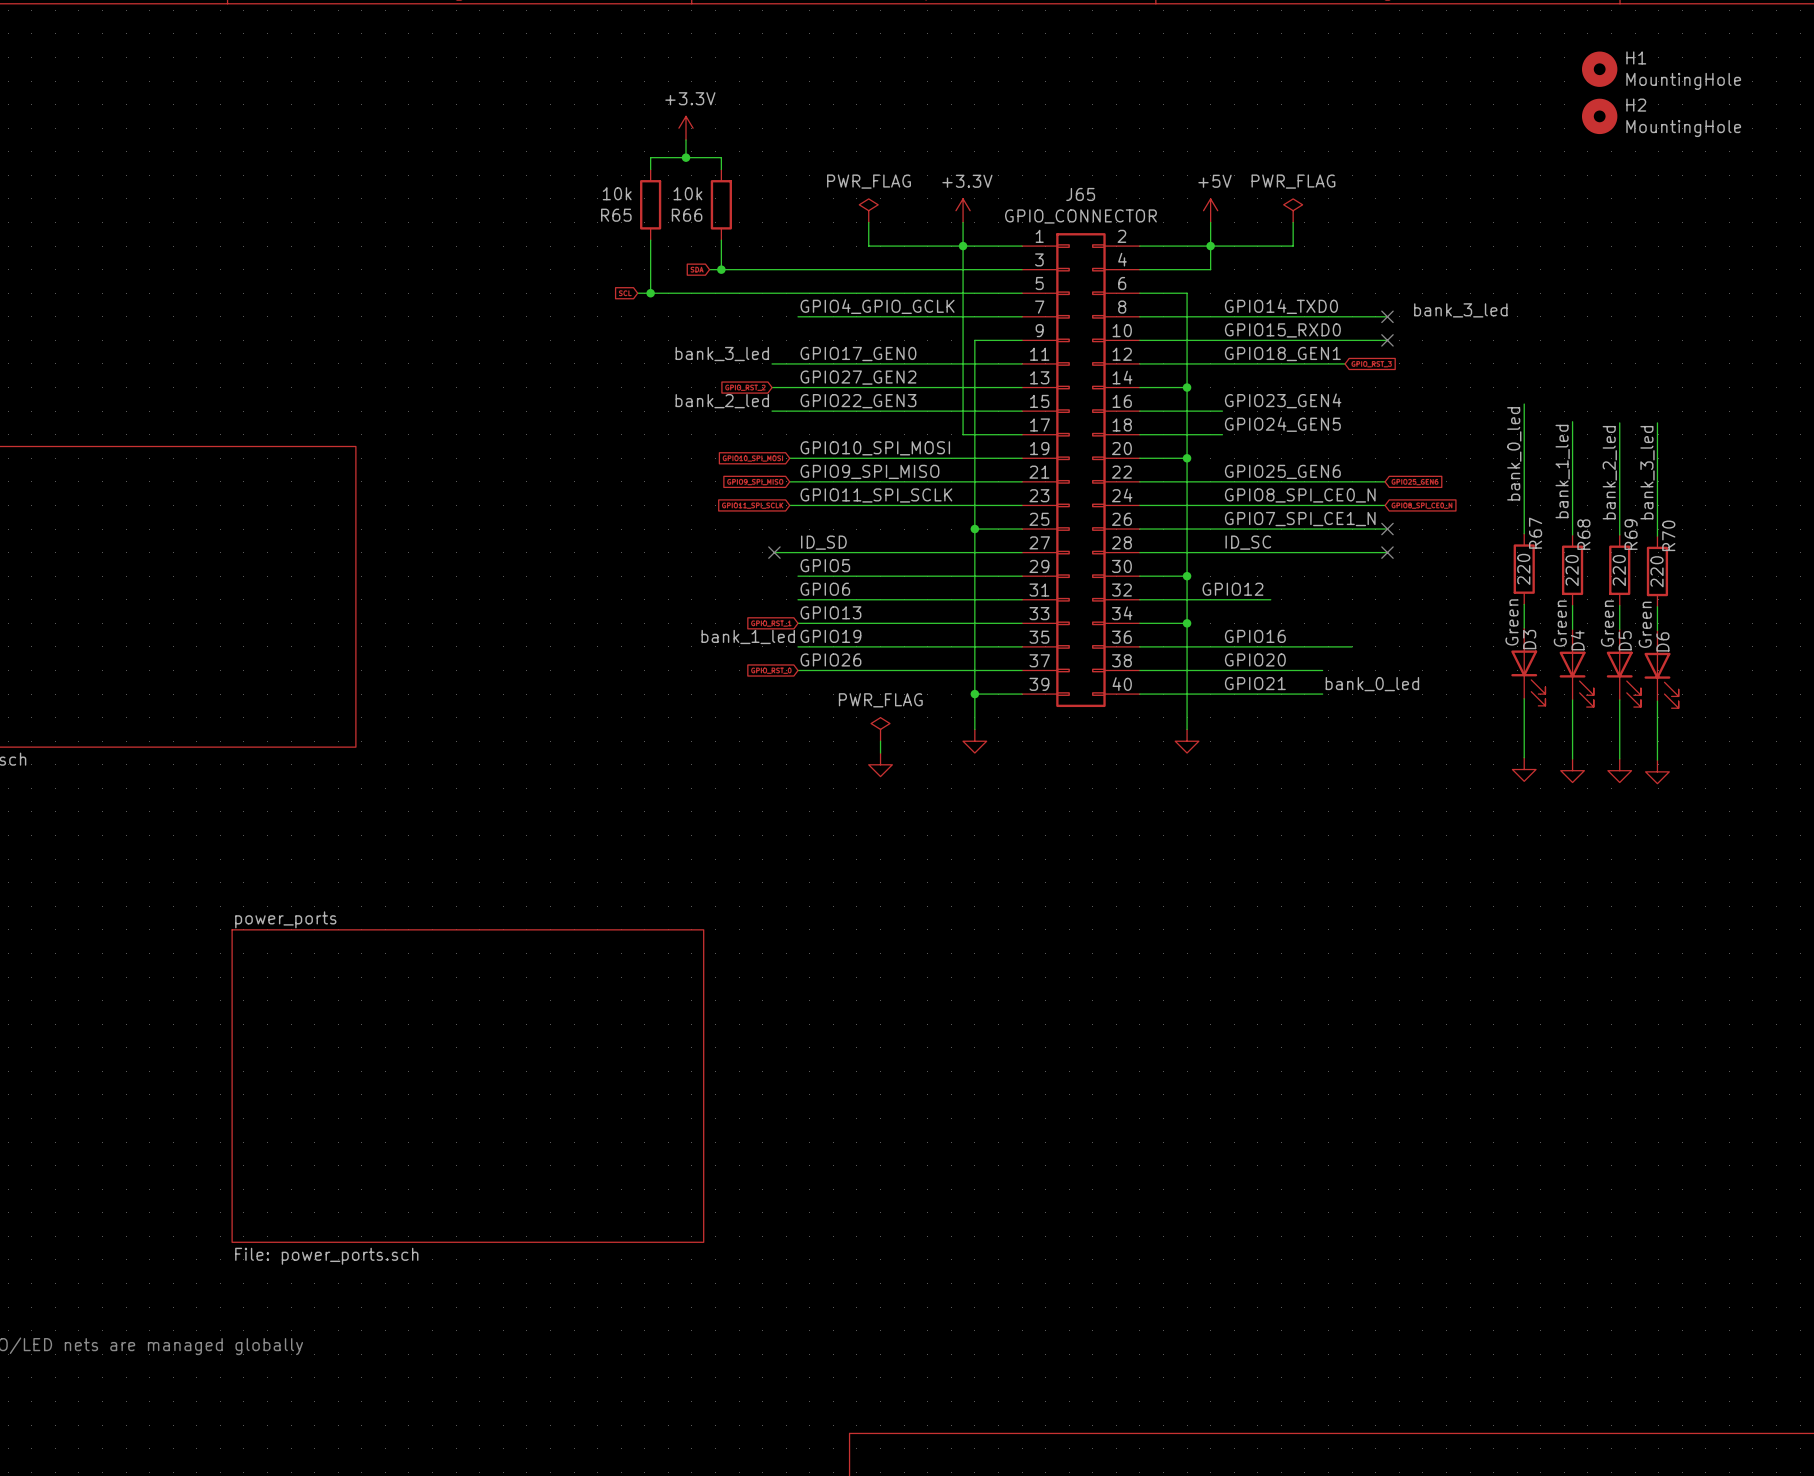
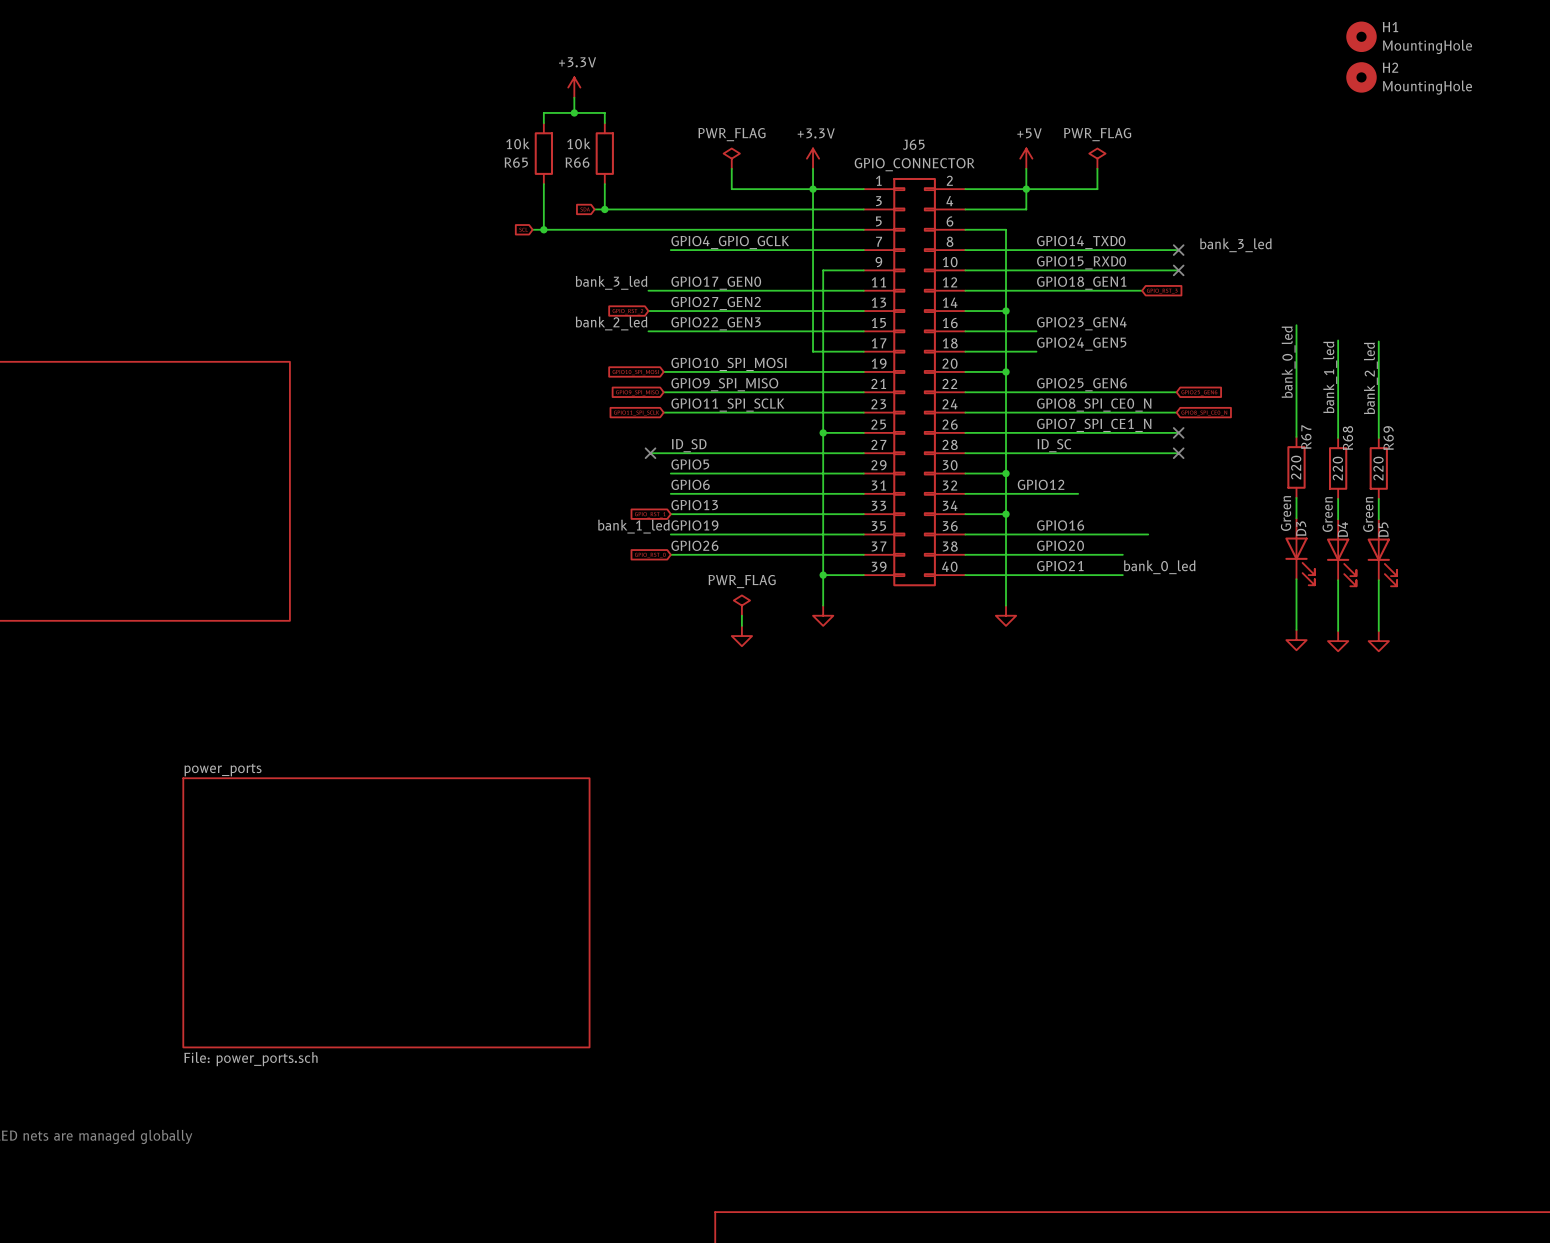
wire: (1657, 422) (1657, 536) -> none
label: bank_3_led (1647, 472) -> none
R70: 220 (1657, 571) -> none
wire: (1657, 606) (1657, 630) -> none
D6: Green (1661, 669) -> none
wire: (1657, 701) (1657, 760) -> none
power symbol: (1657, 771) -> none

